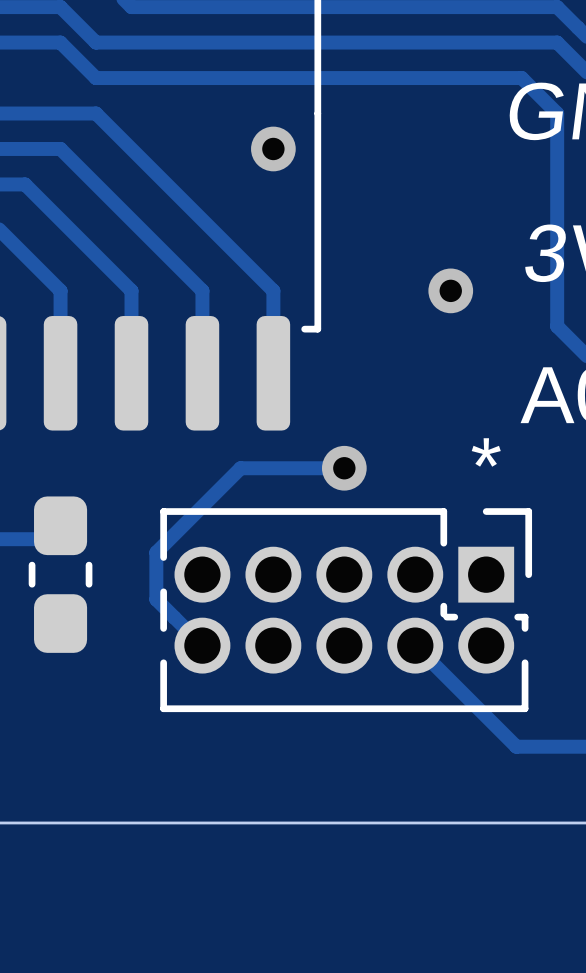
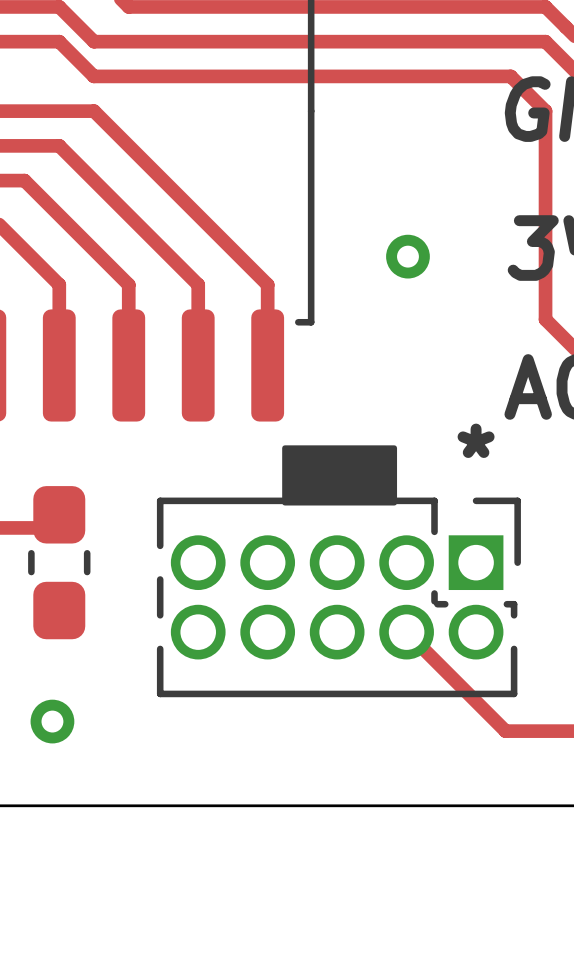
via: (273, 148) -> none
via position: (450, 290) -> (407, 256)
drawing: none -> [282, 445, 398, 506]
track: (344, 468) (240, 468) (156, 552) (156, 599) (202, 645) -> none
via: (344, 468) -> none
via: none -> (52, 721)

